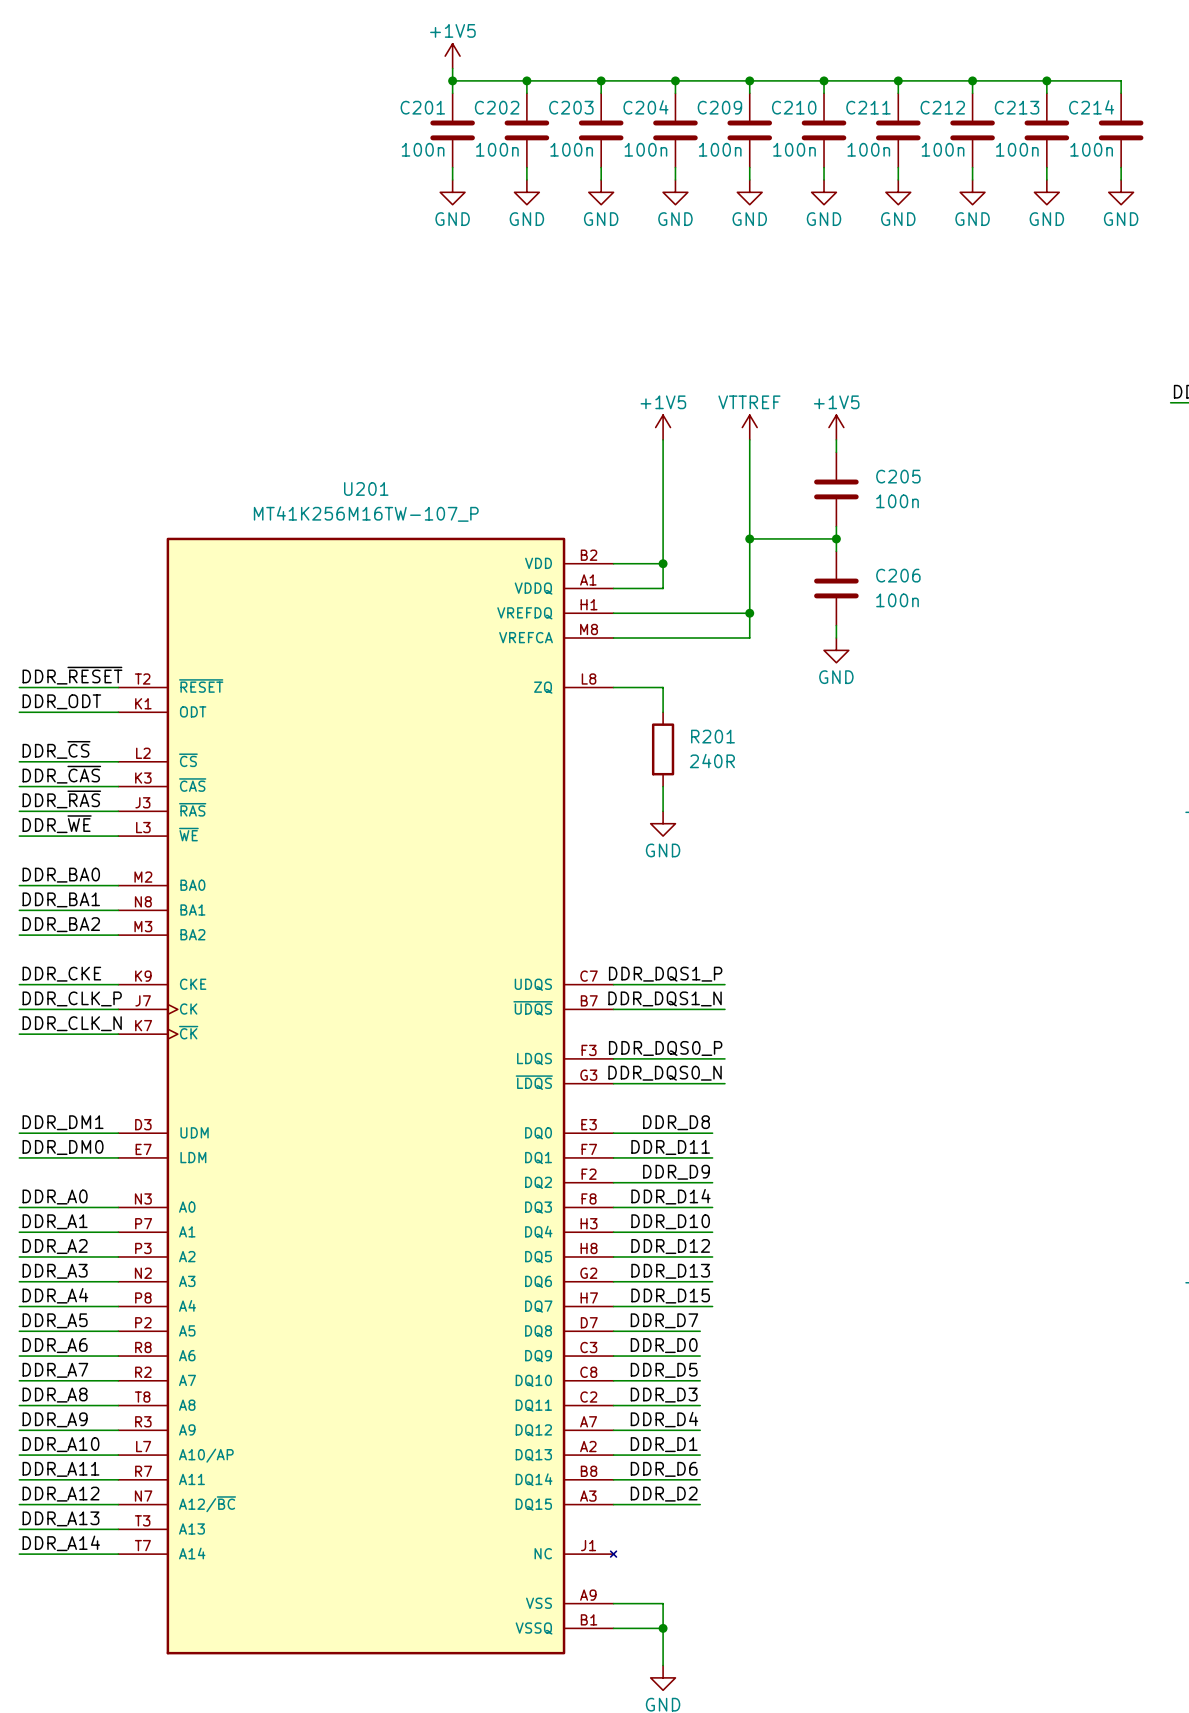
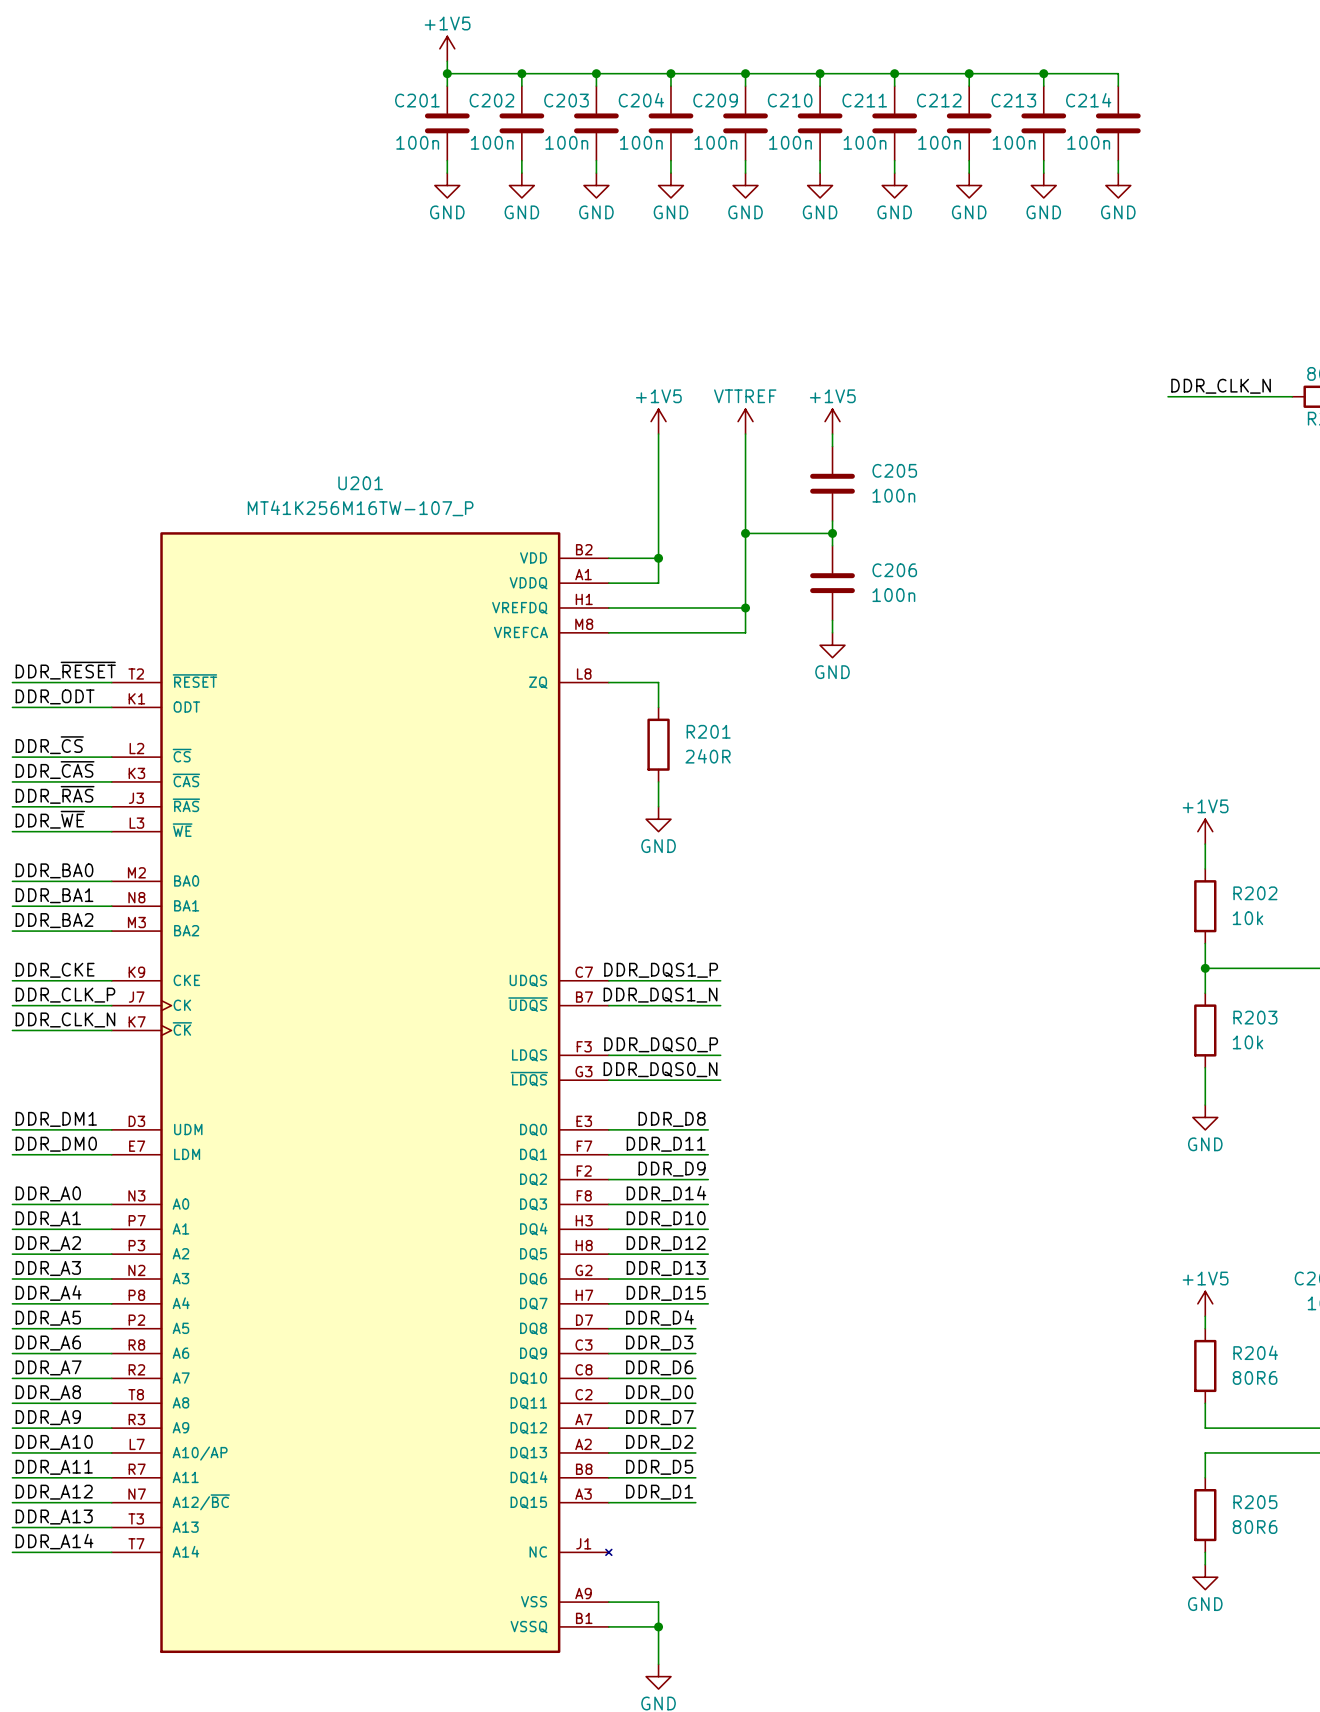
label: DDR_D7 (664, 1320) -> DDR_D4 (659, 1317)
label: DDR_D0 (664, 1345) -> DDR_D3 (659, 1343)
label: DDR_D5 (664, 1370) -> DDR_D6 (659, 1367)
label: DDR_D3 (664, 1395) -> DDR_D0 (659, 1392)
label: DDR_D4 (664, 1419) -> DDR_D7 (659, 1417)
label: DDR_D1 (664, 1444) -> DDR_D2 (659, 1442)
label: DDR_D6 (664, 1469) -> DDR_D5 (659, 1467)
label: DDR_D2 (664, 1494) -> DDR_D1 (659, 1492)

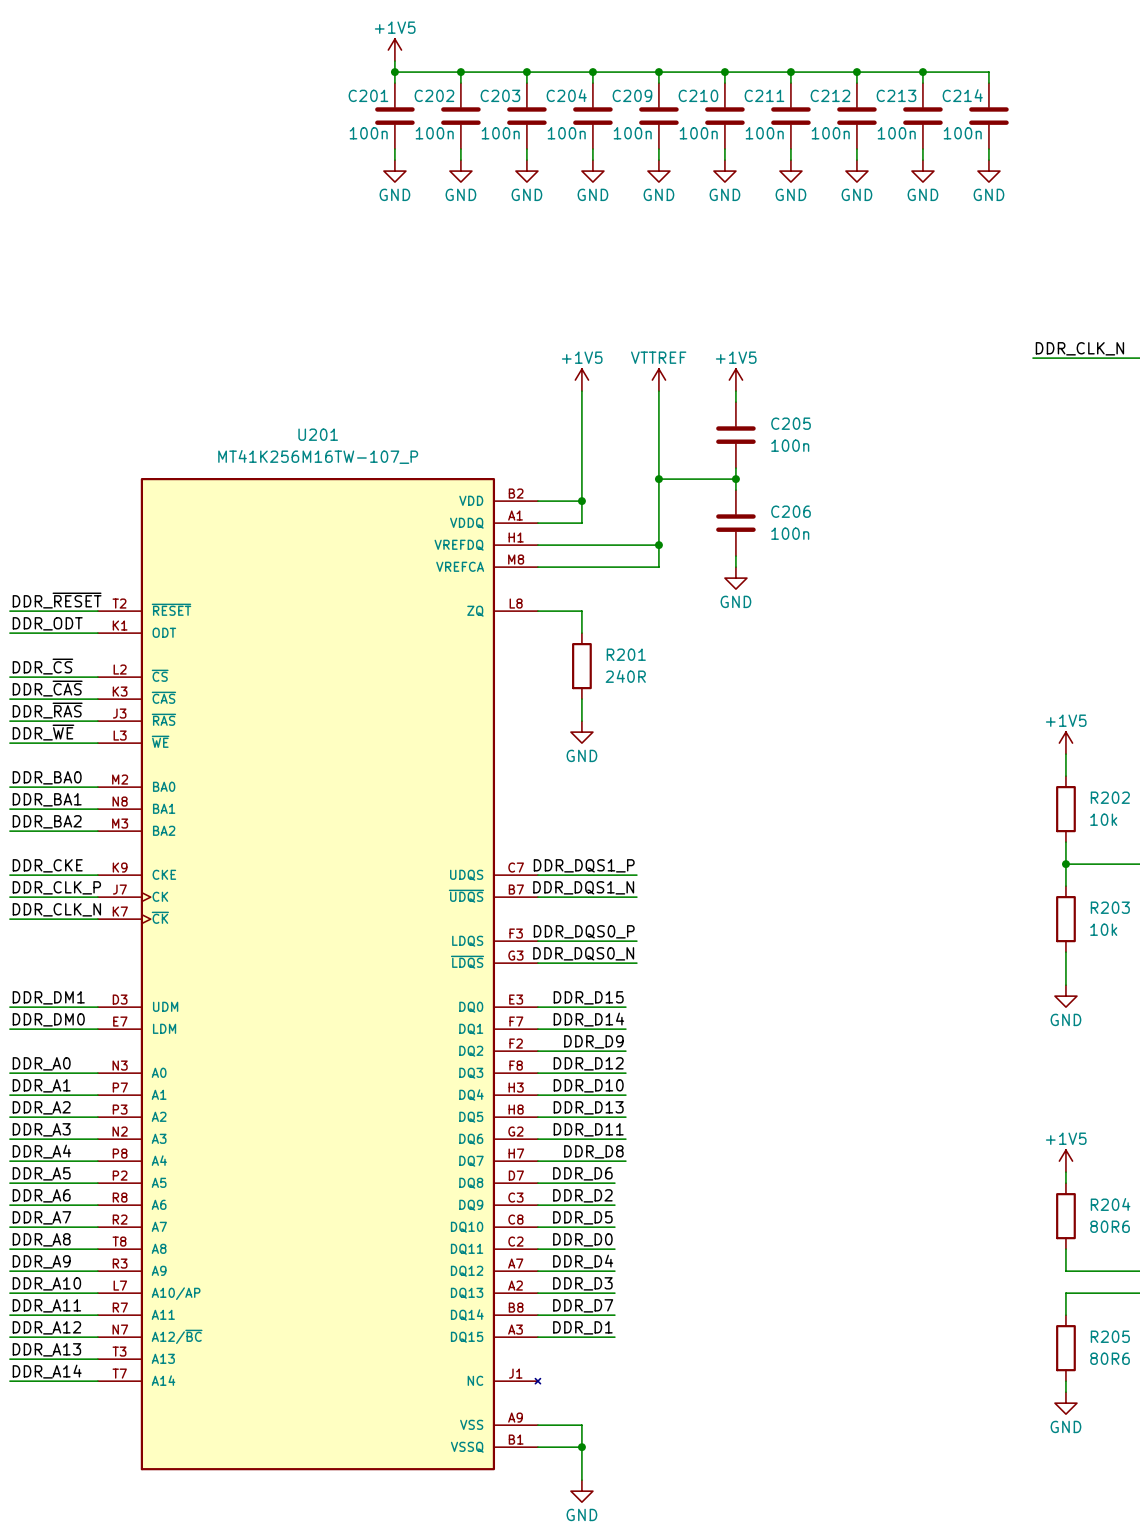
label: DDR_D8 (672, 1119) -> DDR_D15 (588, 997)
label: DDR_D11 (666, 1144) -> DDR_D14 (588, 1019)
label: DDR_D14 (666, 1193) -> DDR_D12 (588, 1063)
label: DDR_D12 (666, 1243) -> DDR_D13 (588, 1107)
label: DDR_D13 (666, 1268) -> DDR_D11 (588, 1129)
label: DDR_D15 (666, 1293) -> DDR_D8 (593, 1151)
label: DDR_D4 (659, 1317) -> DDR_D6 (582, 1173)
label: DDR_D3 (659, 1343) -> DDR_D2 (582, 1195)
label: DDR_D6 (659, 1367) -> DDR_D5 (582, 1217)
label: DDR_D7 (659, 1417) -> DDR_D4 (583, 1261)
label: DDR_D2 (659, 1442) -> DDR_D3 (582, 1283)
label: DDR_D5 (659, 1467) -> DDR_D7 (583, 1305)

